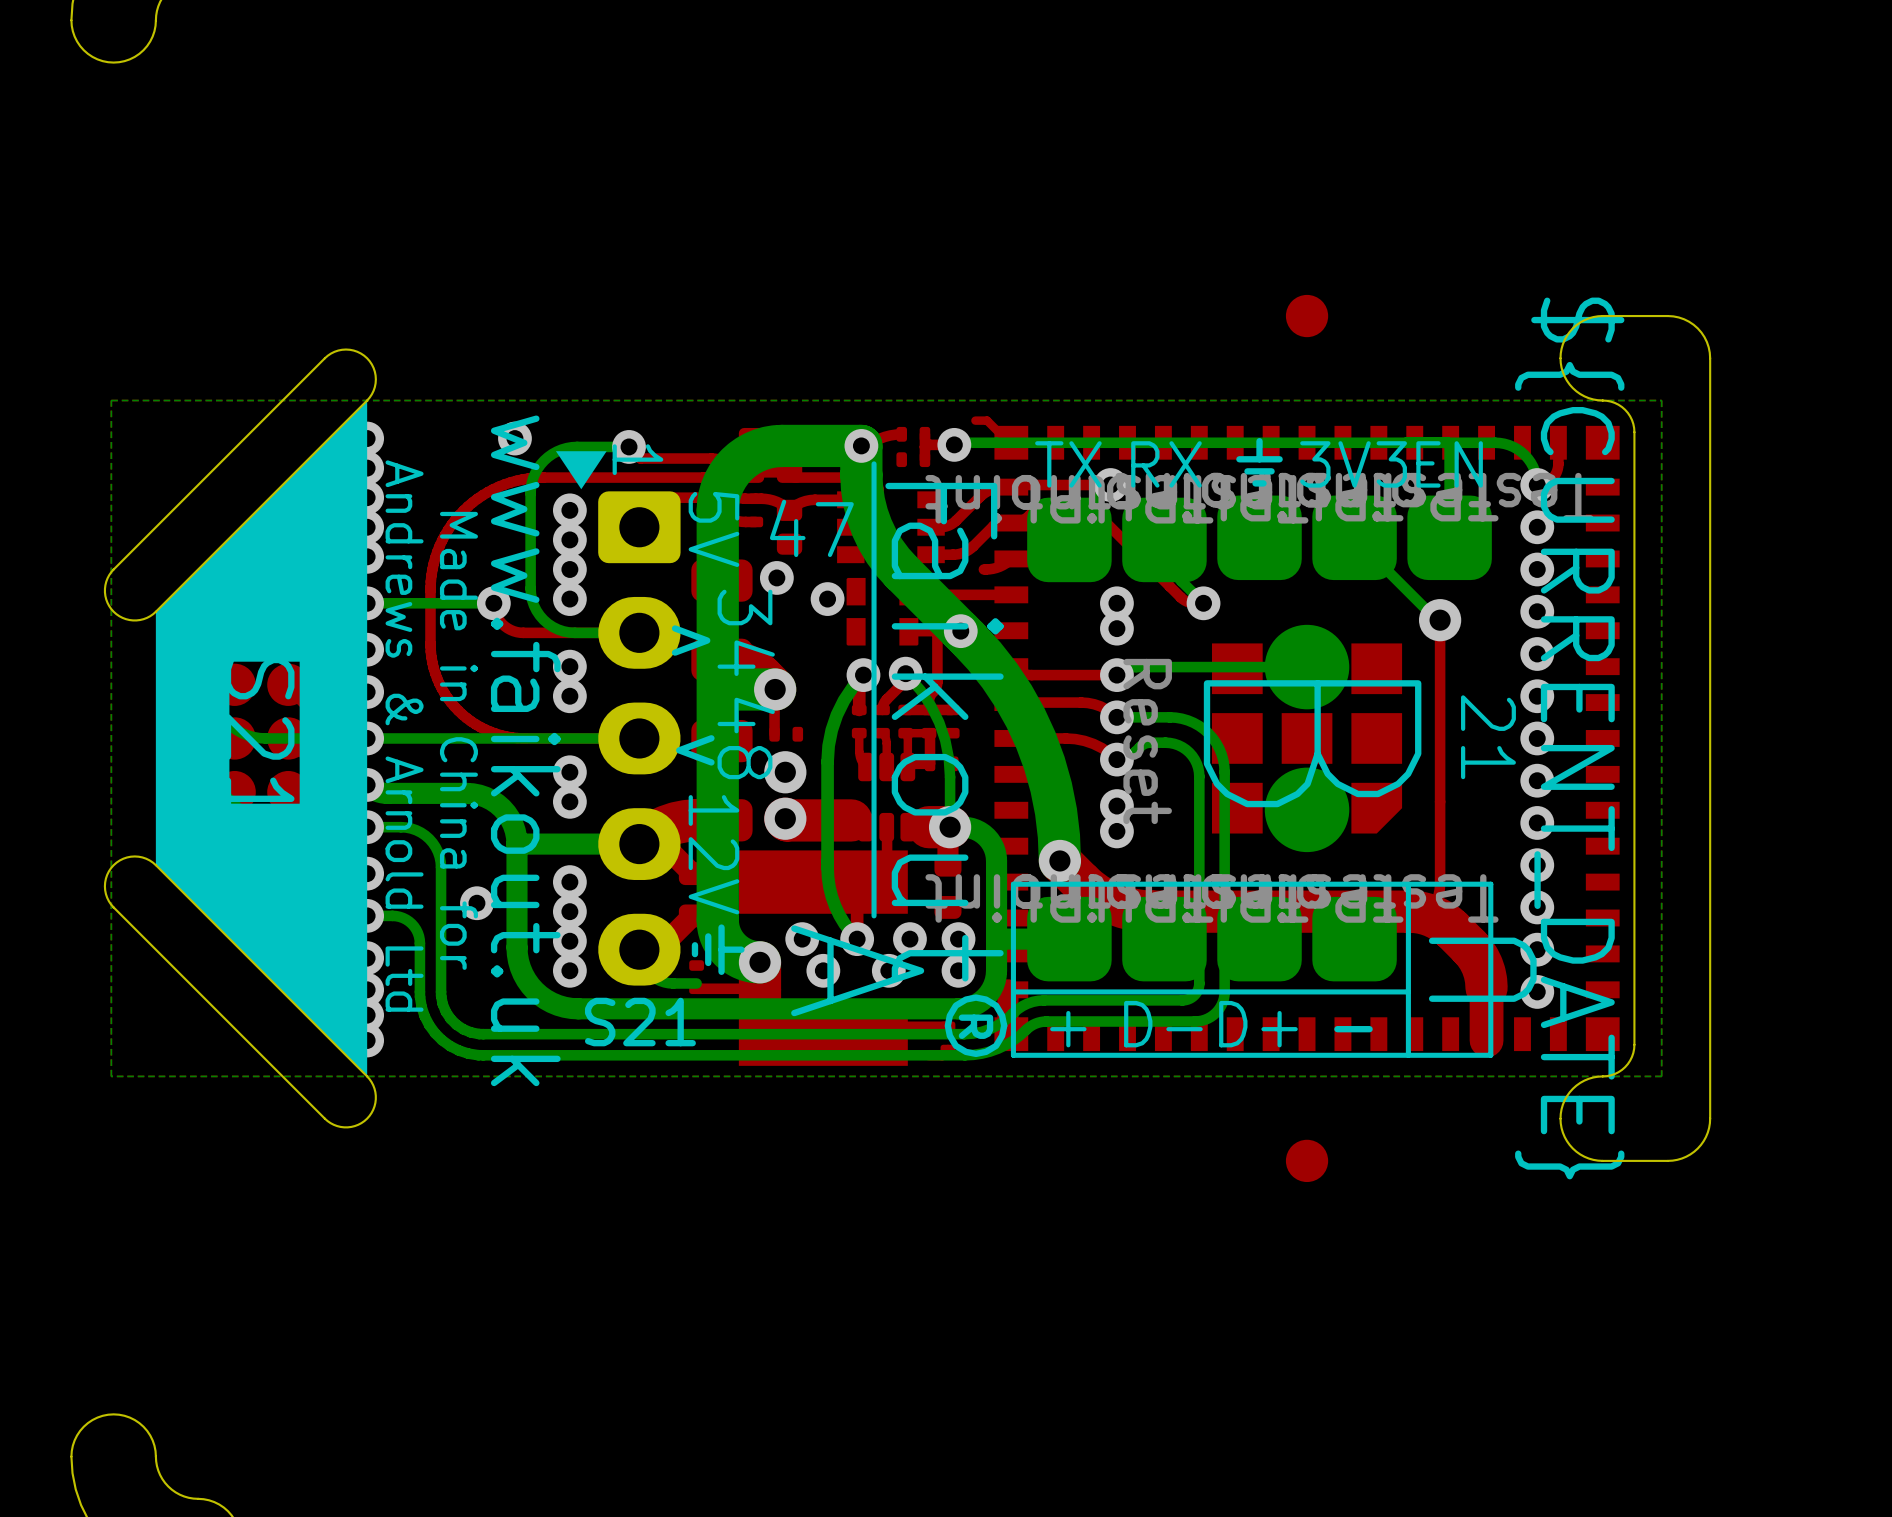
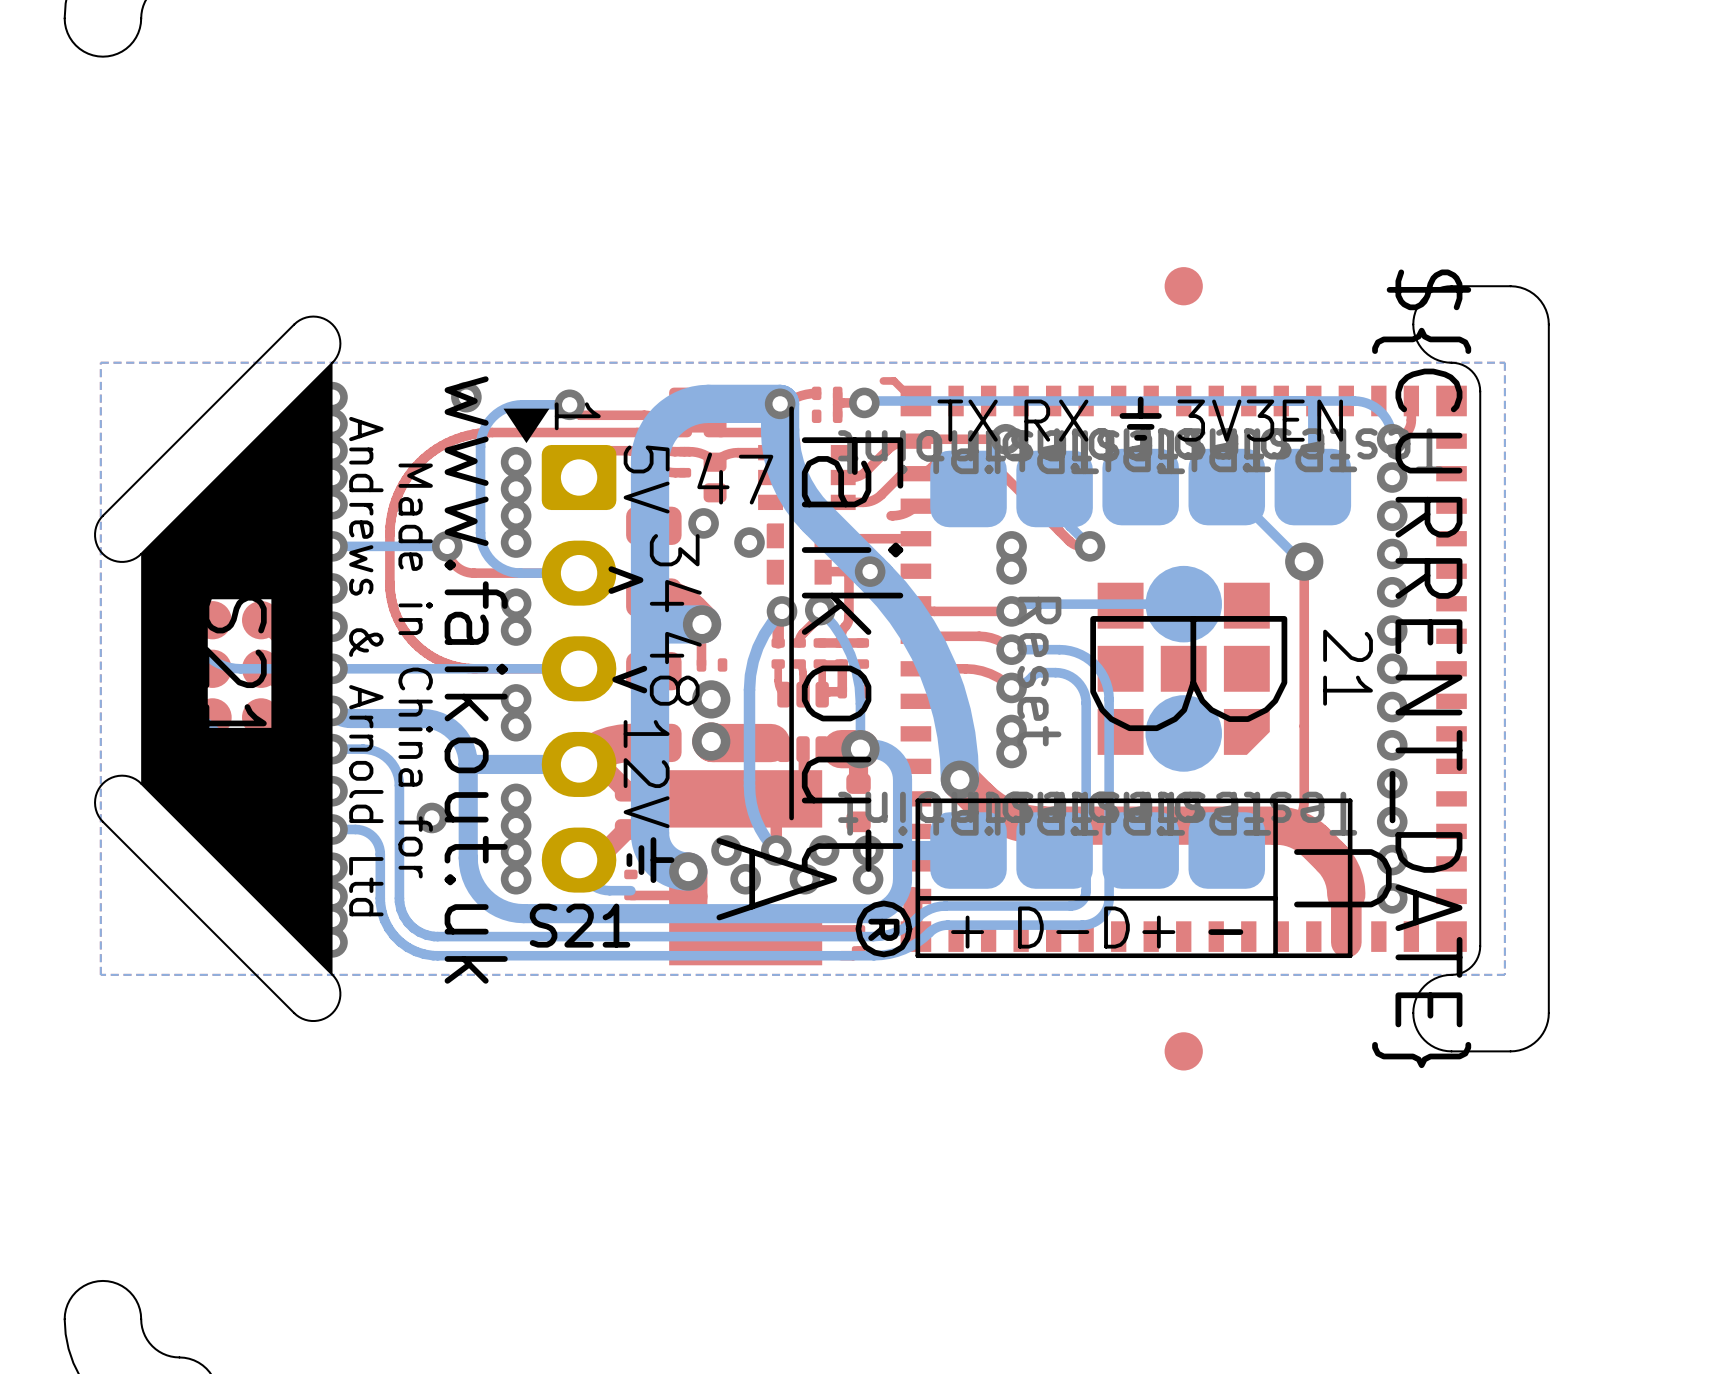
text position: aikout (947, 752) -> aikout (852, 663)
line: (874, 903) (874, 915) -> (791, 408) (791, 420)

